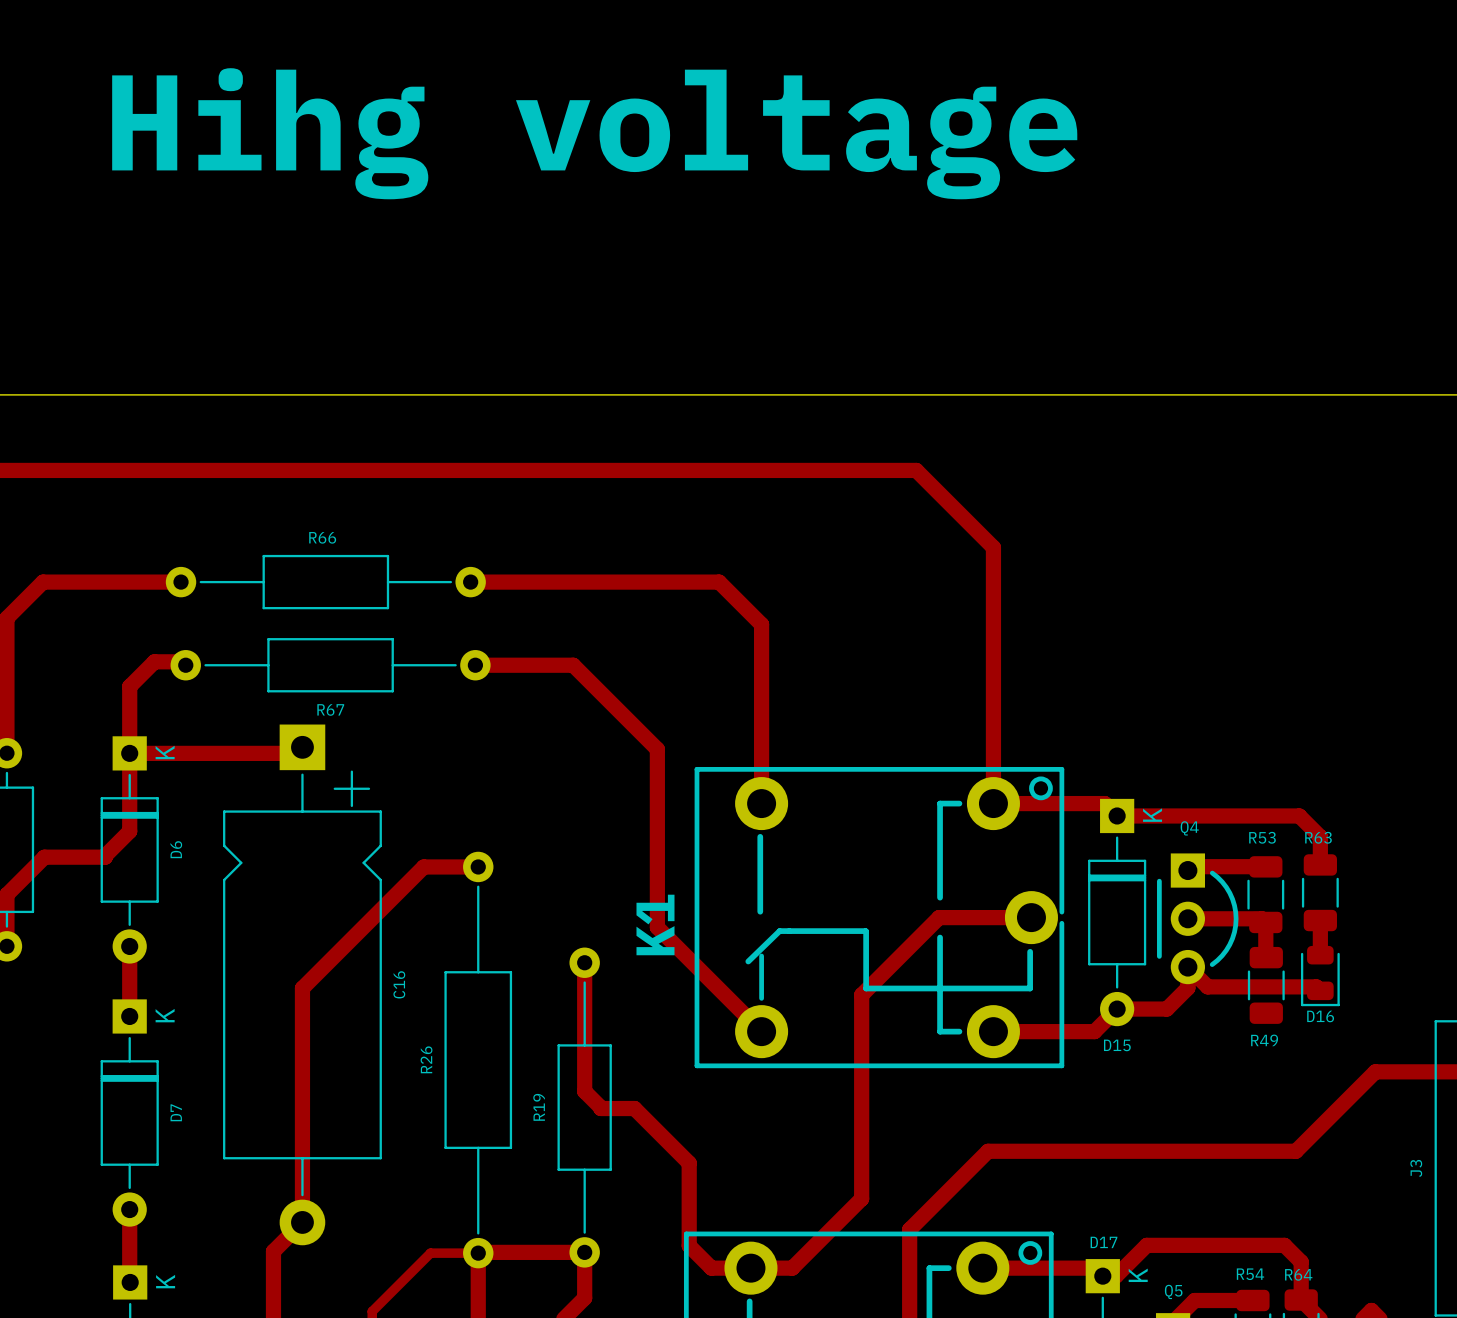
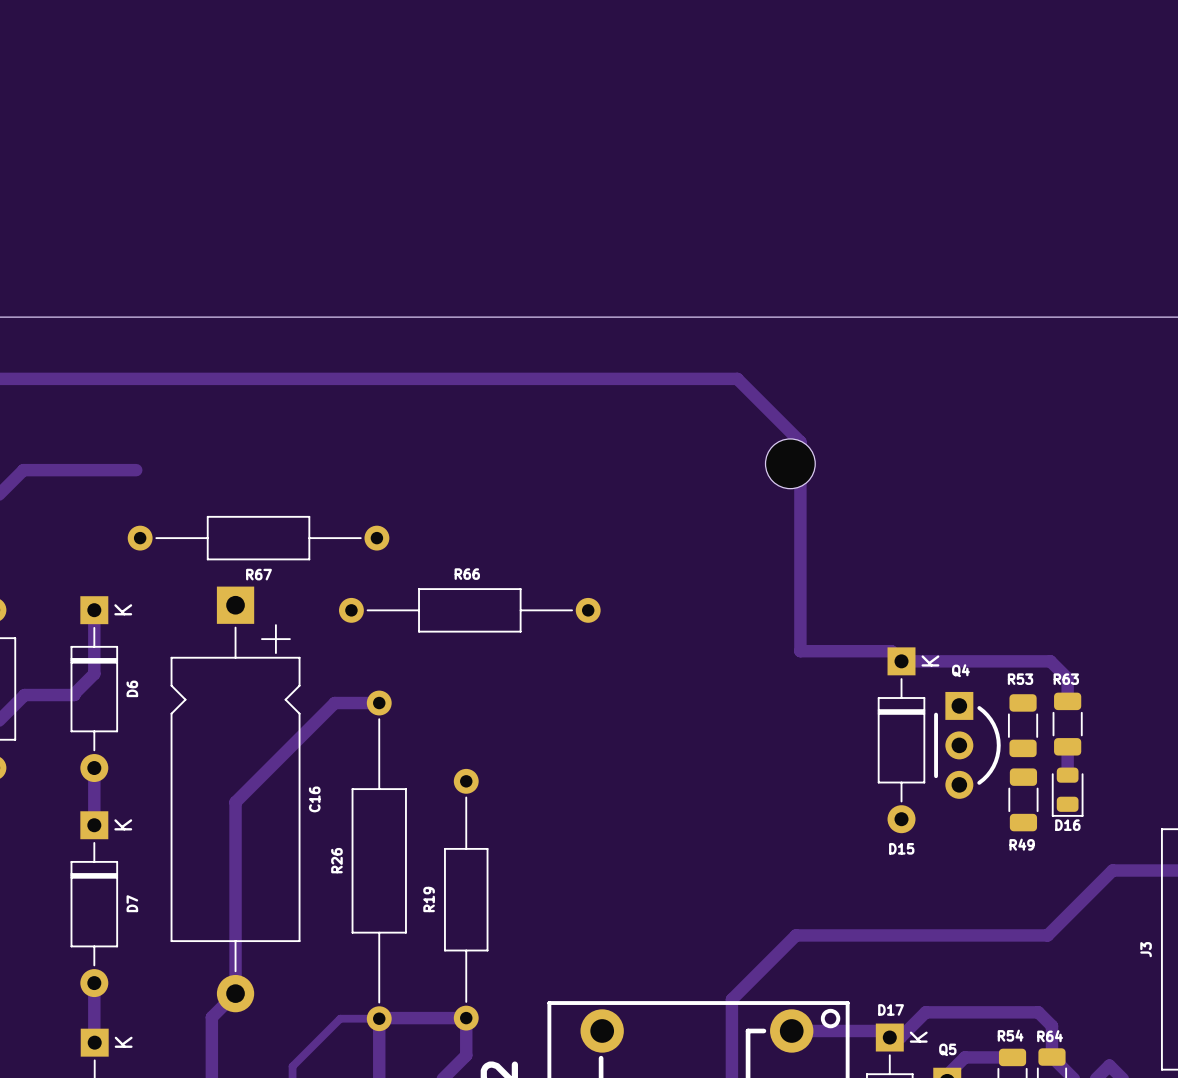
text: Hihg voltage (594, 133) -> none
part: none -> (790, 463)
R66 position: (325, 582) -> (469, 610)
track: (470, 582) (719, 582) (761, 624) (761, 803) -> none
track: (185, 665) (182, 661) (154, 661) (129, 686) (129, 753) (296, 753) (302, 747) -> none
track: (475, 665) (573, 665) (657, 749) (657, 927) (761, 1031) -> none
track: (1265, 866) (1191, 866) (1187, 870) -> none
part: (879, 917) -> none
track: (1031, 917) (939, 917) (861, 995) (861, 1198) (792, 1268) (711, 1268) (689, 1245) (689, 1163) (634, 1108) (600, 1108) (584, 1091) (584, 962) -> none
track: (1187, 918) (1262, 918) (1265, 922) (1266, 957) -> none
text: K1 (655, 924) -> none
track: (1320, 990) (1316, 986) (1207, 986) (1187, 967) (1187, 988) (1166, 1009) (1117, 1009) (1094, 1031) (993, 1031) -> none

